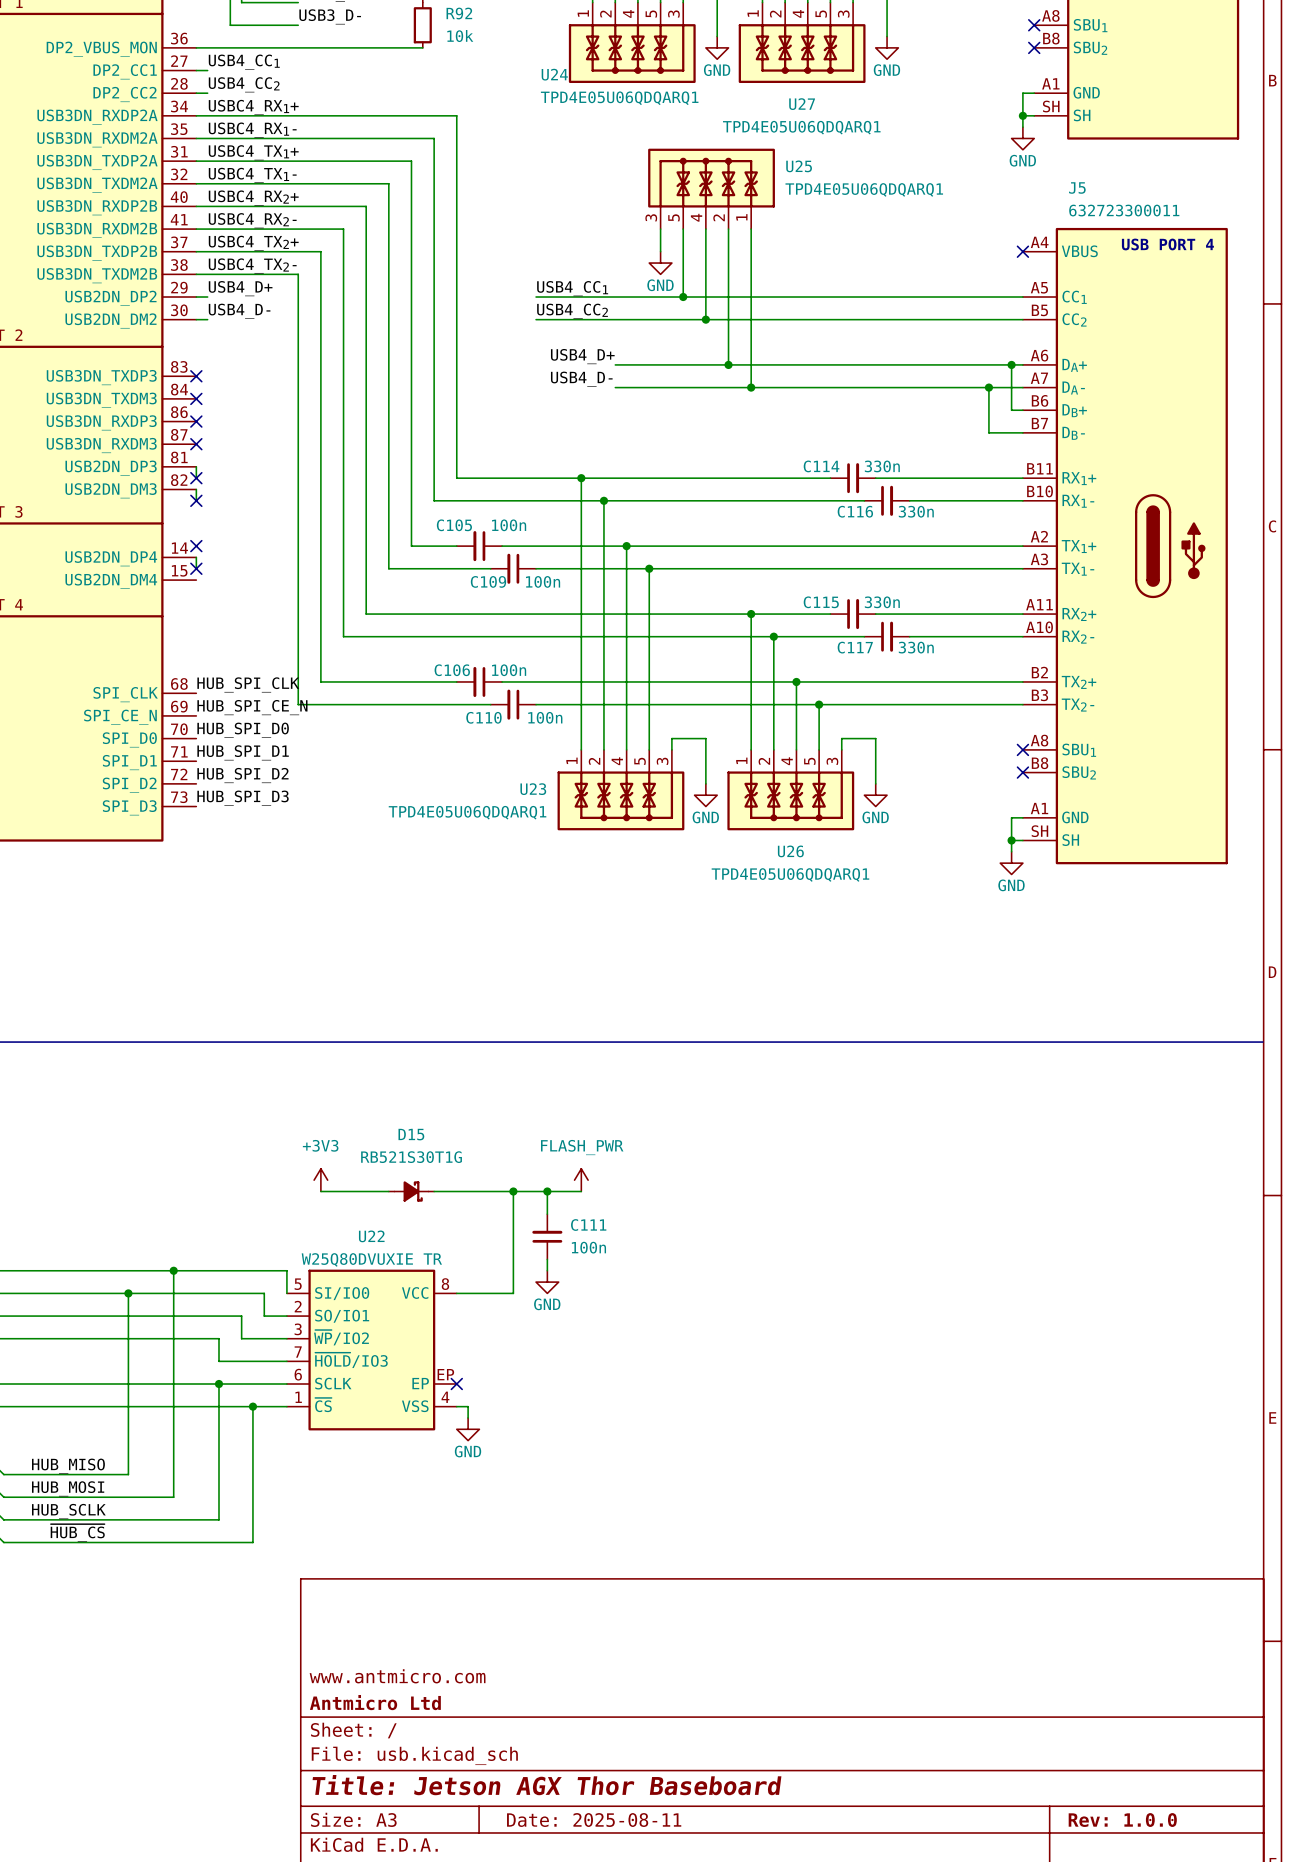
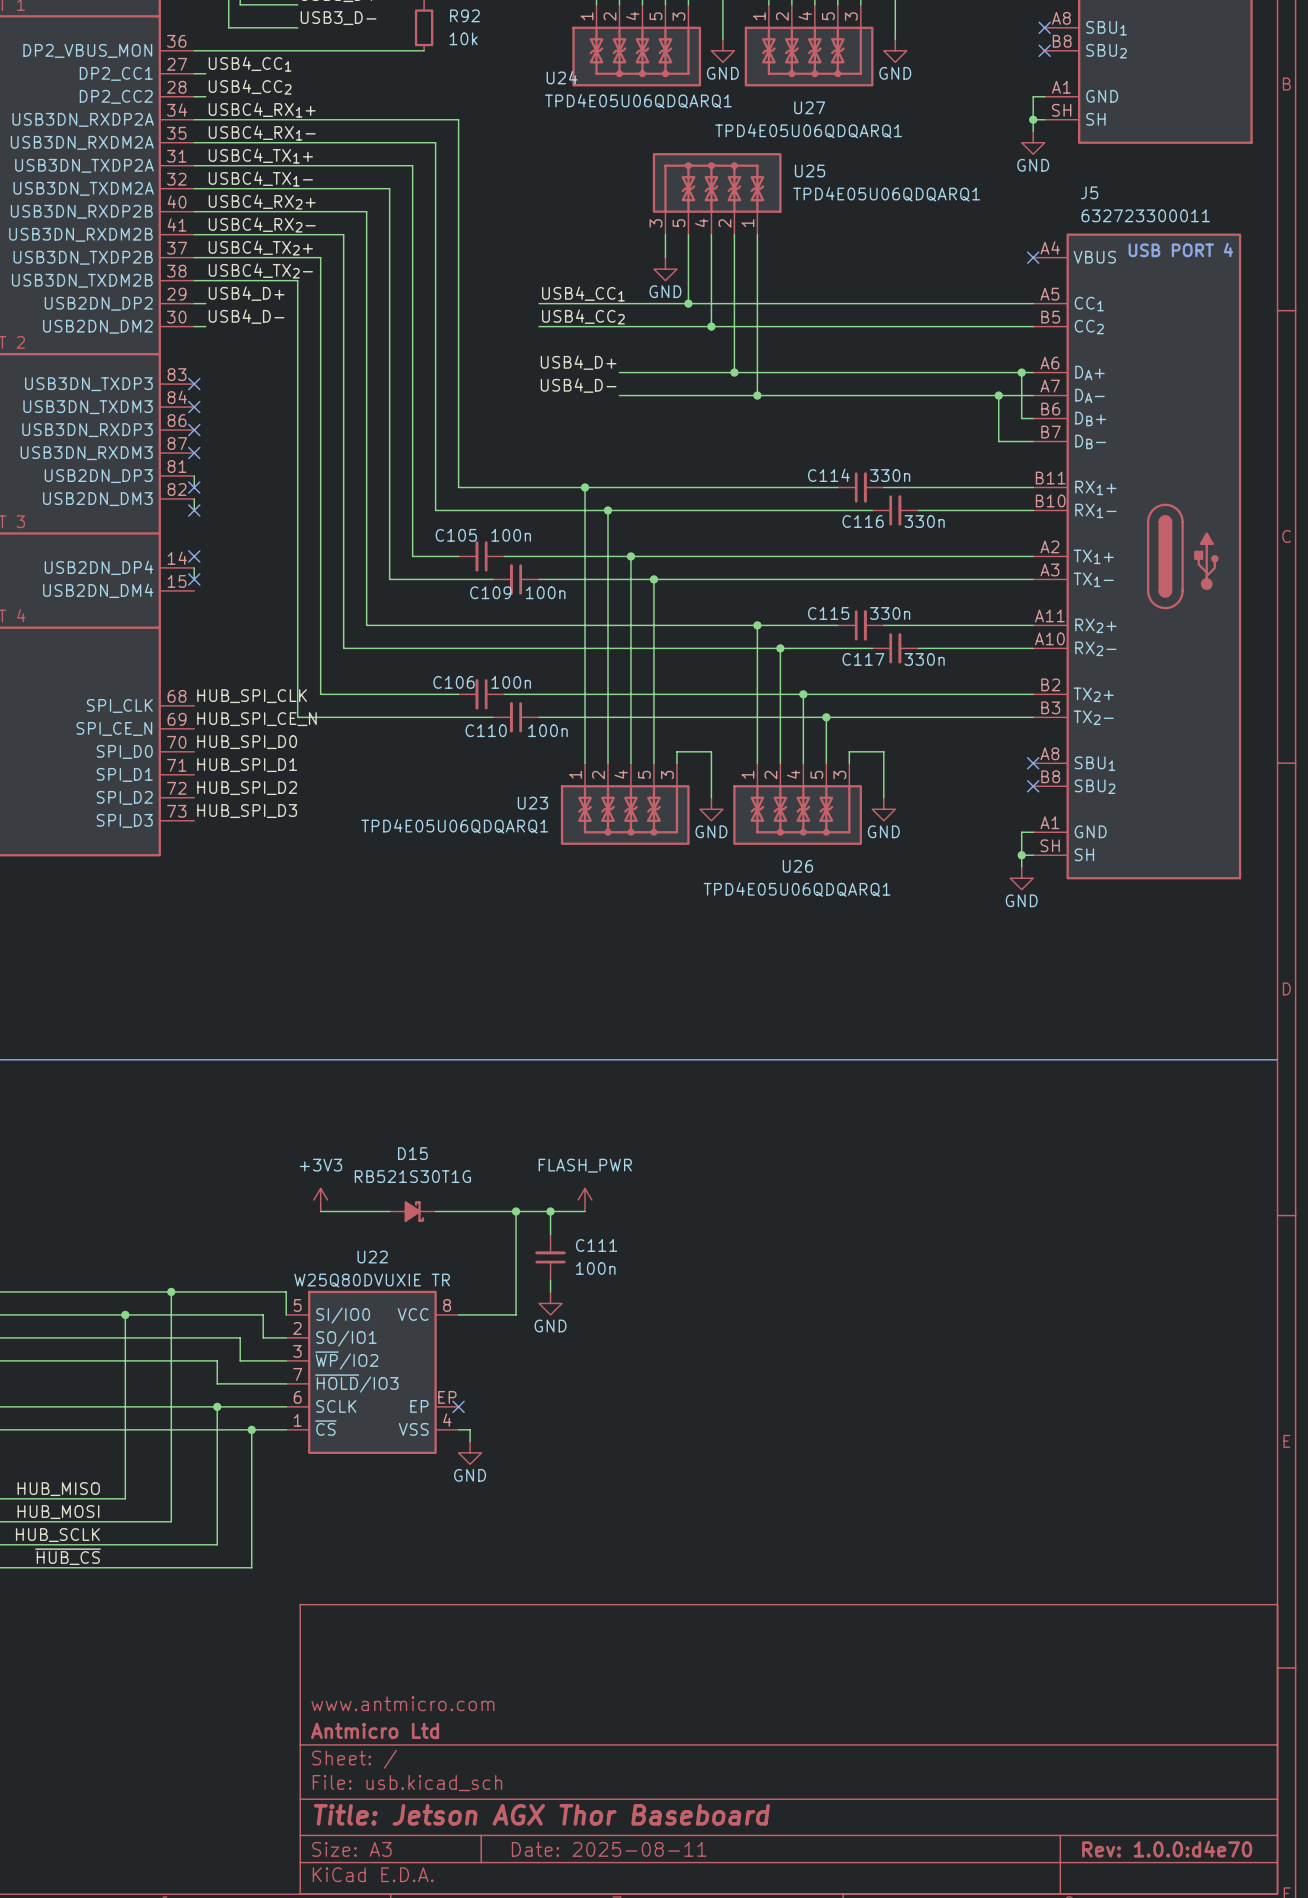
title block: Rev: 1.0.0 (1122, 1820) -> Rev: 1.0.0:d4e70 (1167, 1849)

